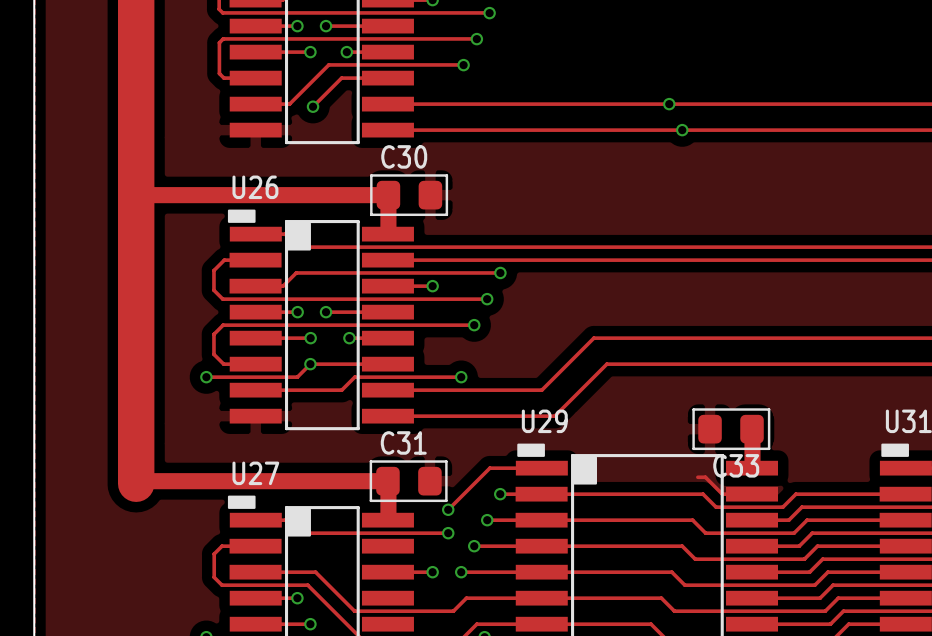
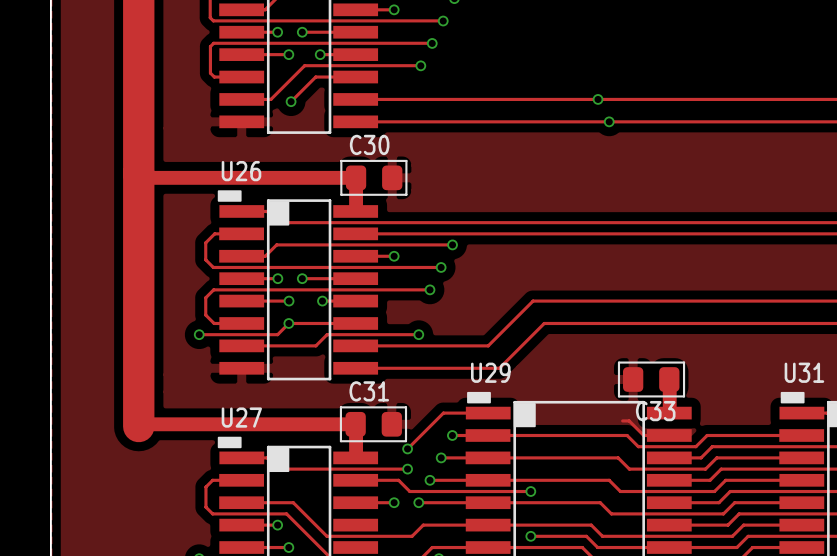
track: none -> (355, 480) (398, 480) (409, 491) (530, 491)
via: none -> (530, 491)
track: none -> (530, 536) (586, 536) (597, 547) (669, 547)
via: none -> (530, 536)

